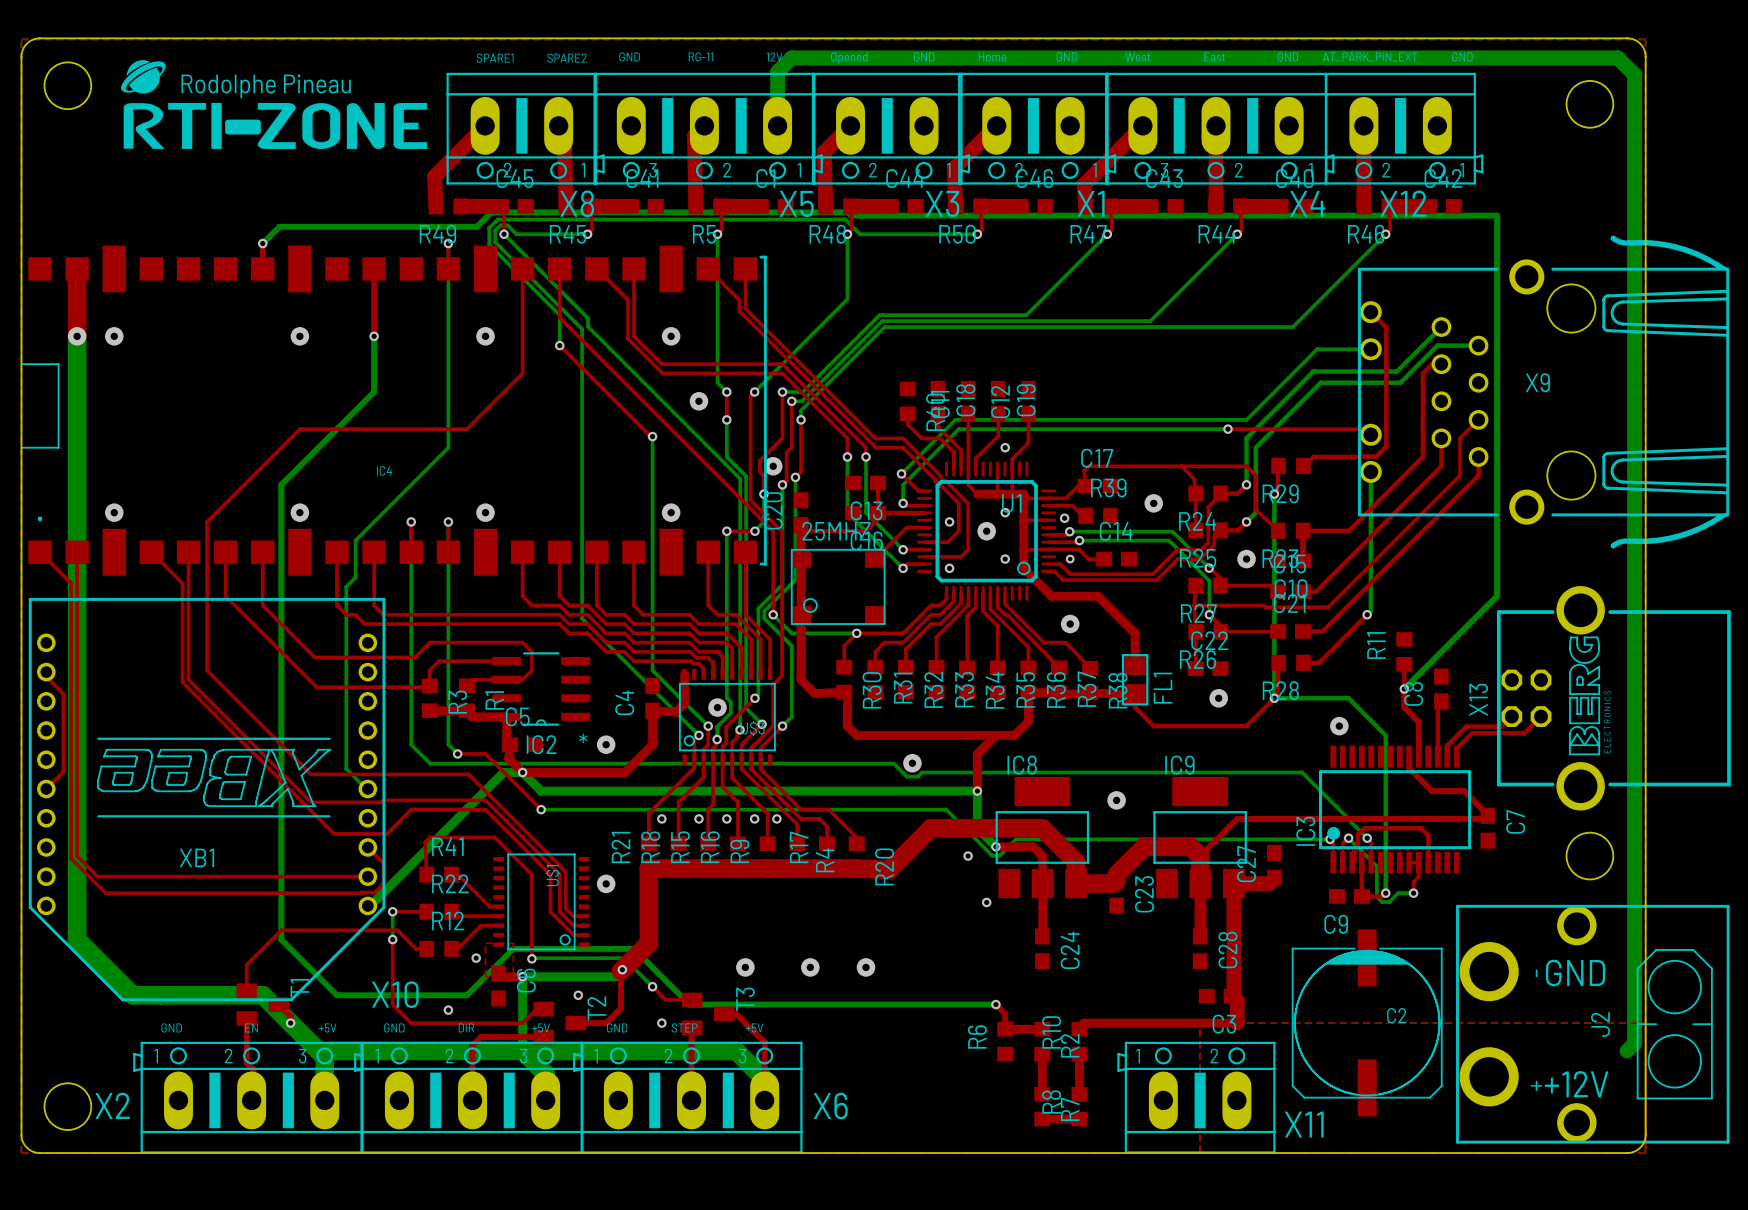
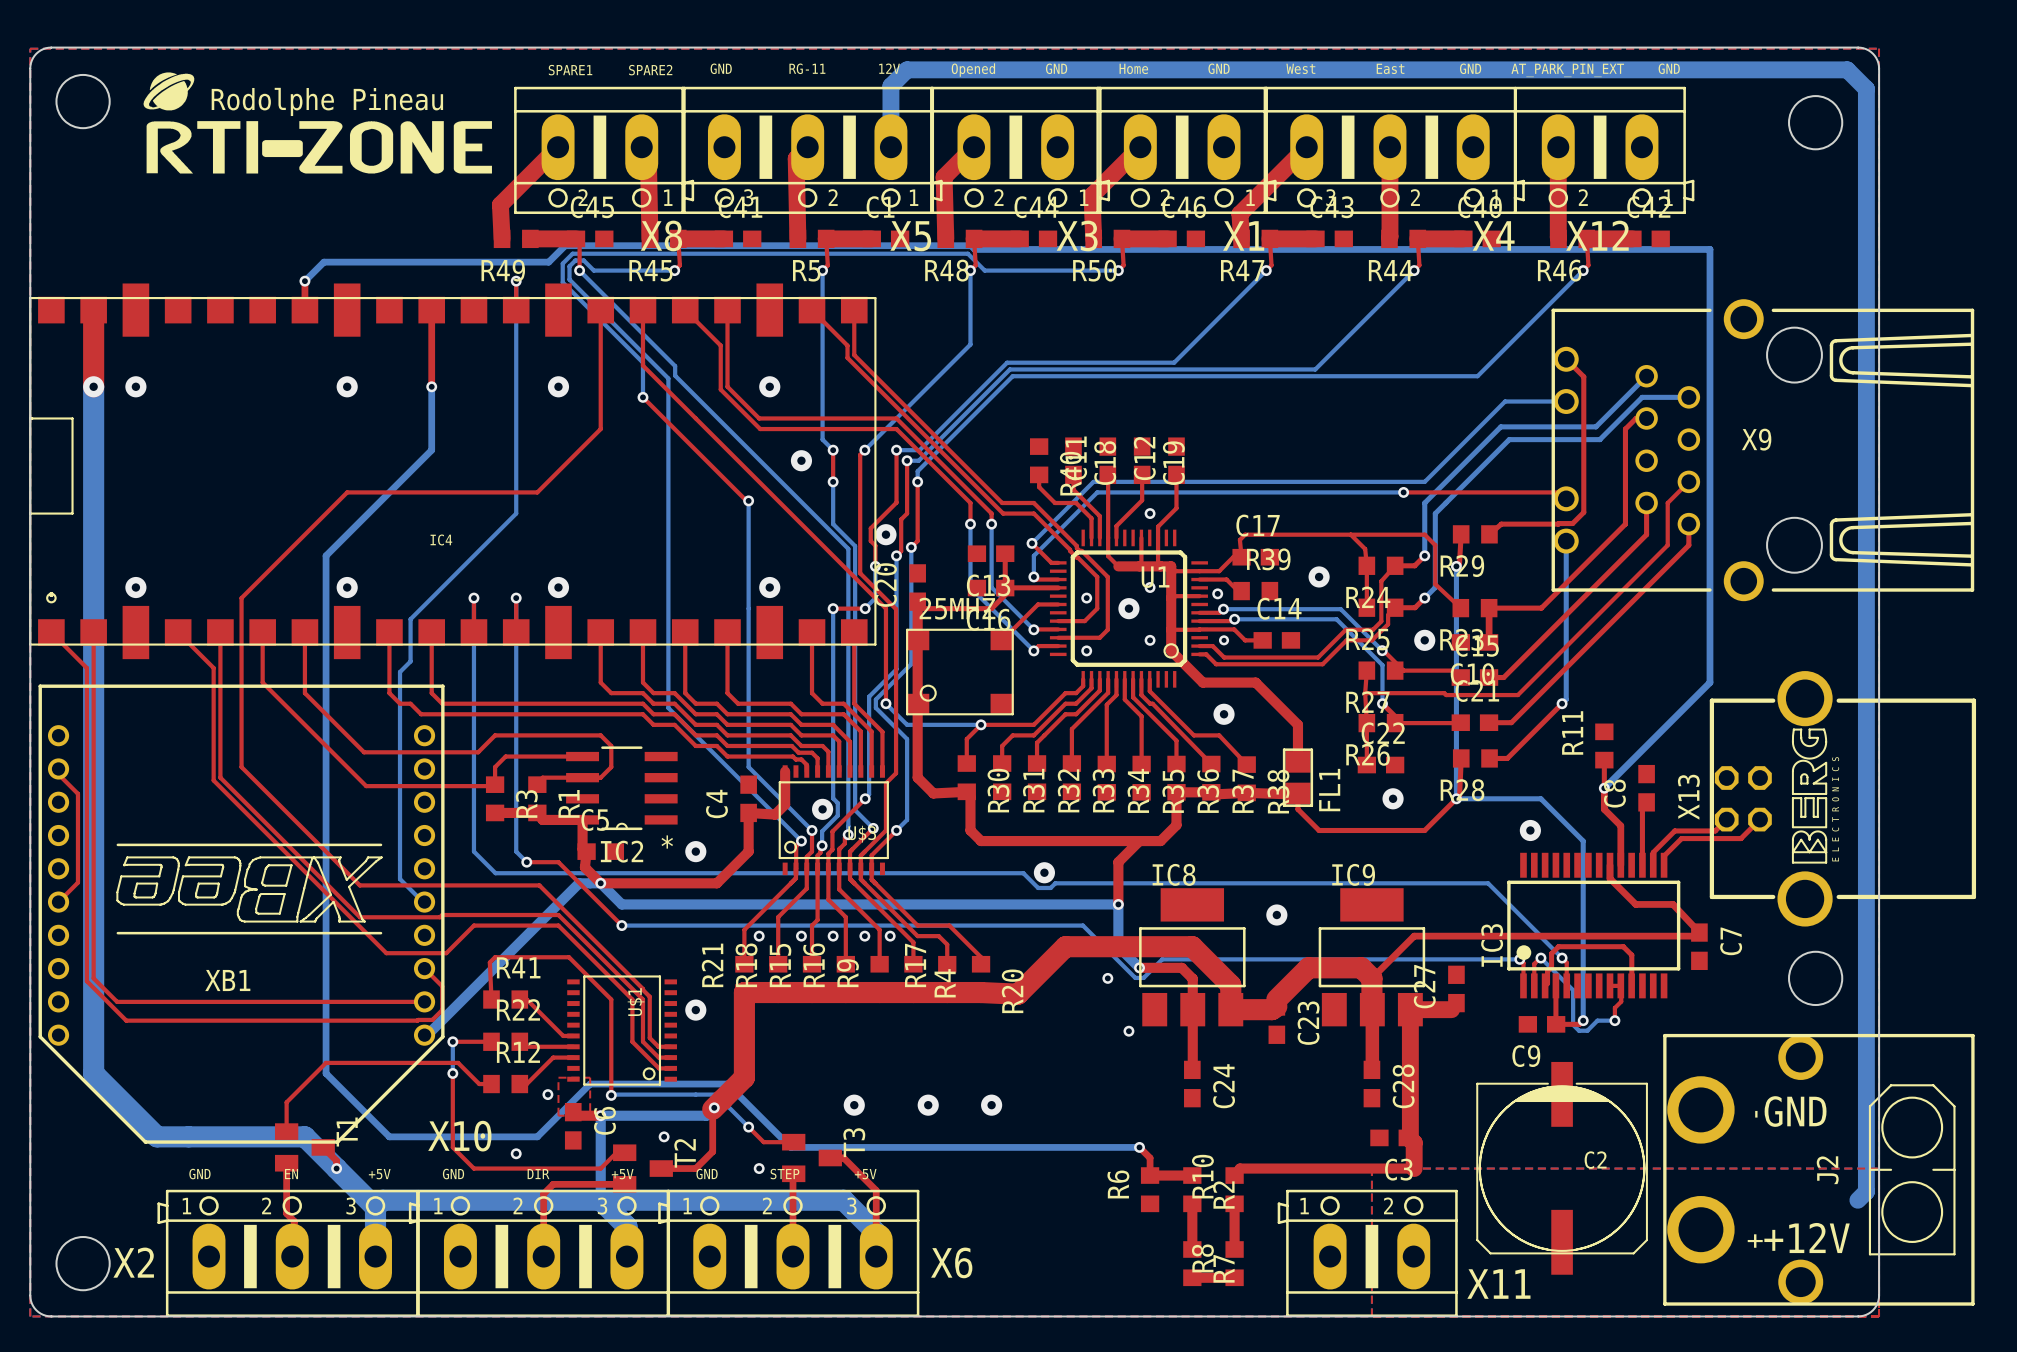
X9 footprint: [1357, 235, 1730, 549] -> [1551, 299, 1975, 602]
IC4 footprint: [20, 245, 767, 576] -> [29, 283, 877, 660]

